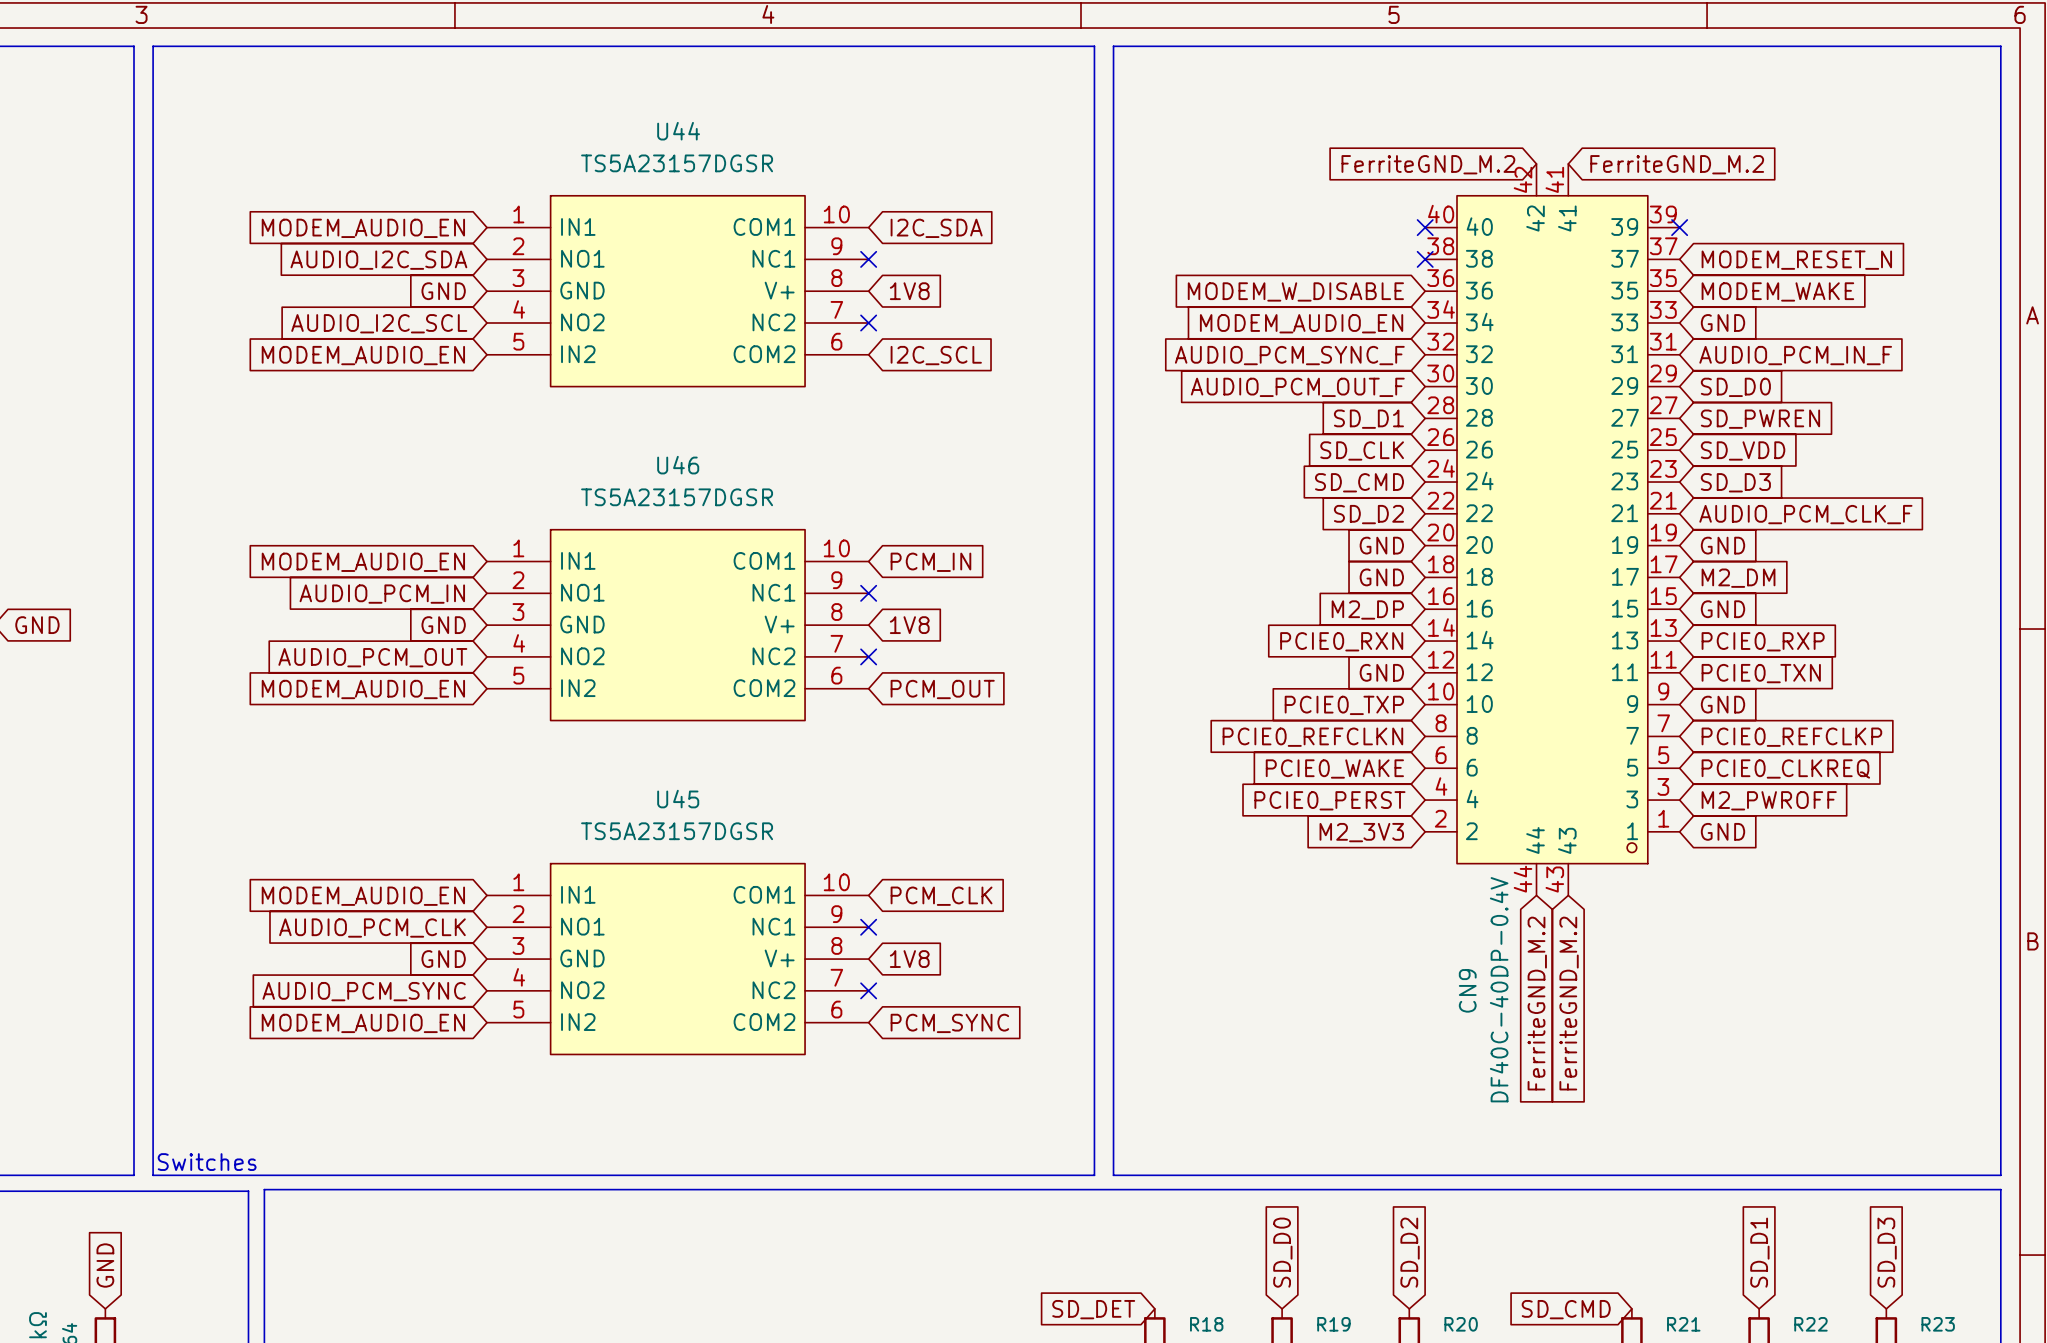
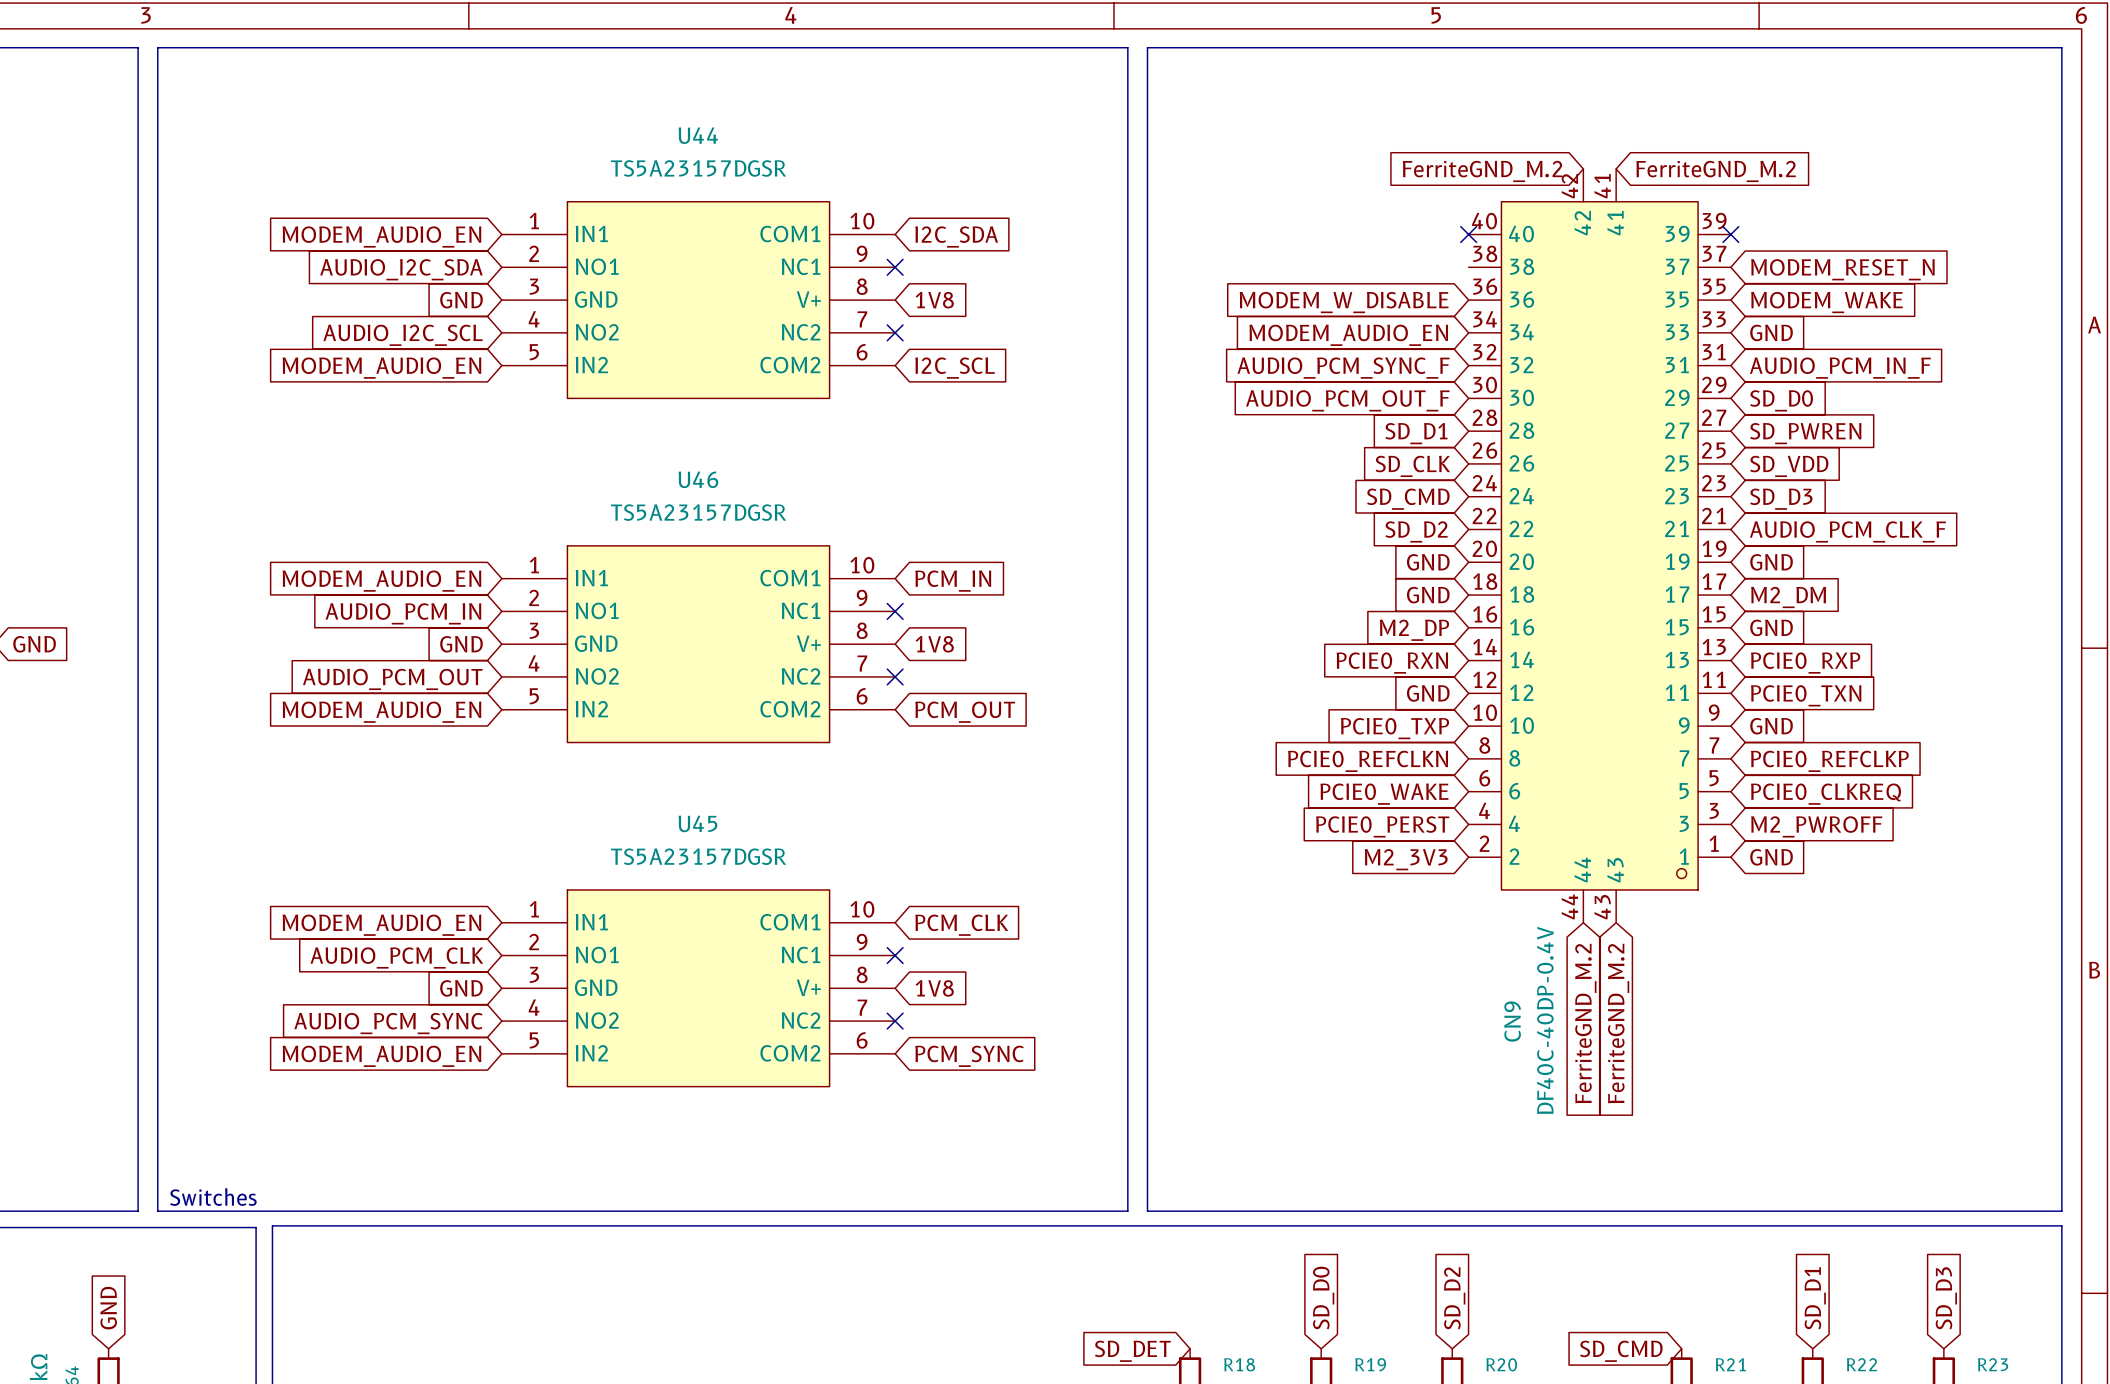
no-connect mark: (1425, 259) -> none

